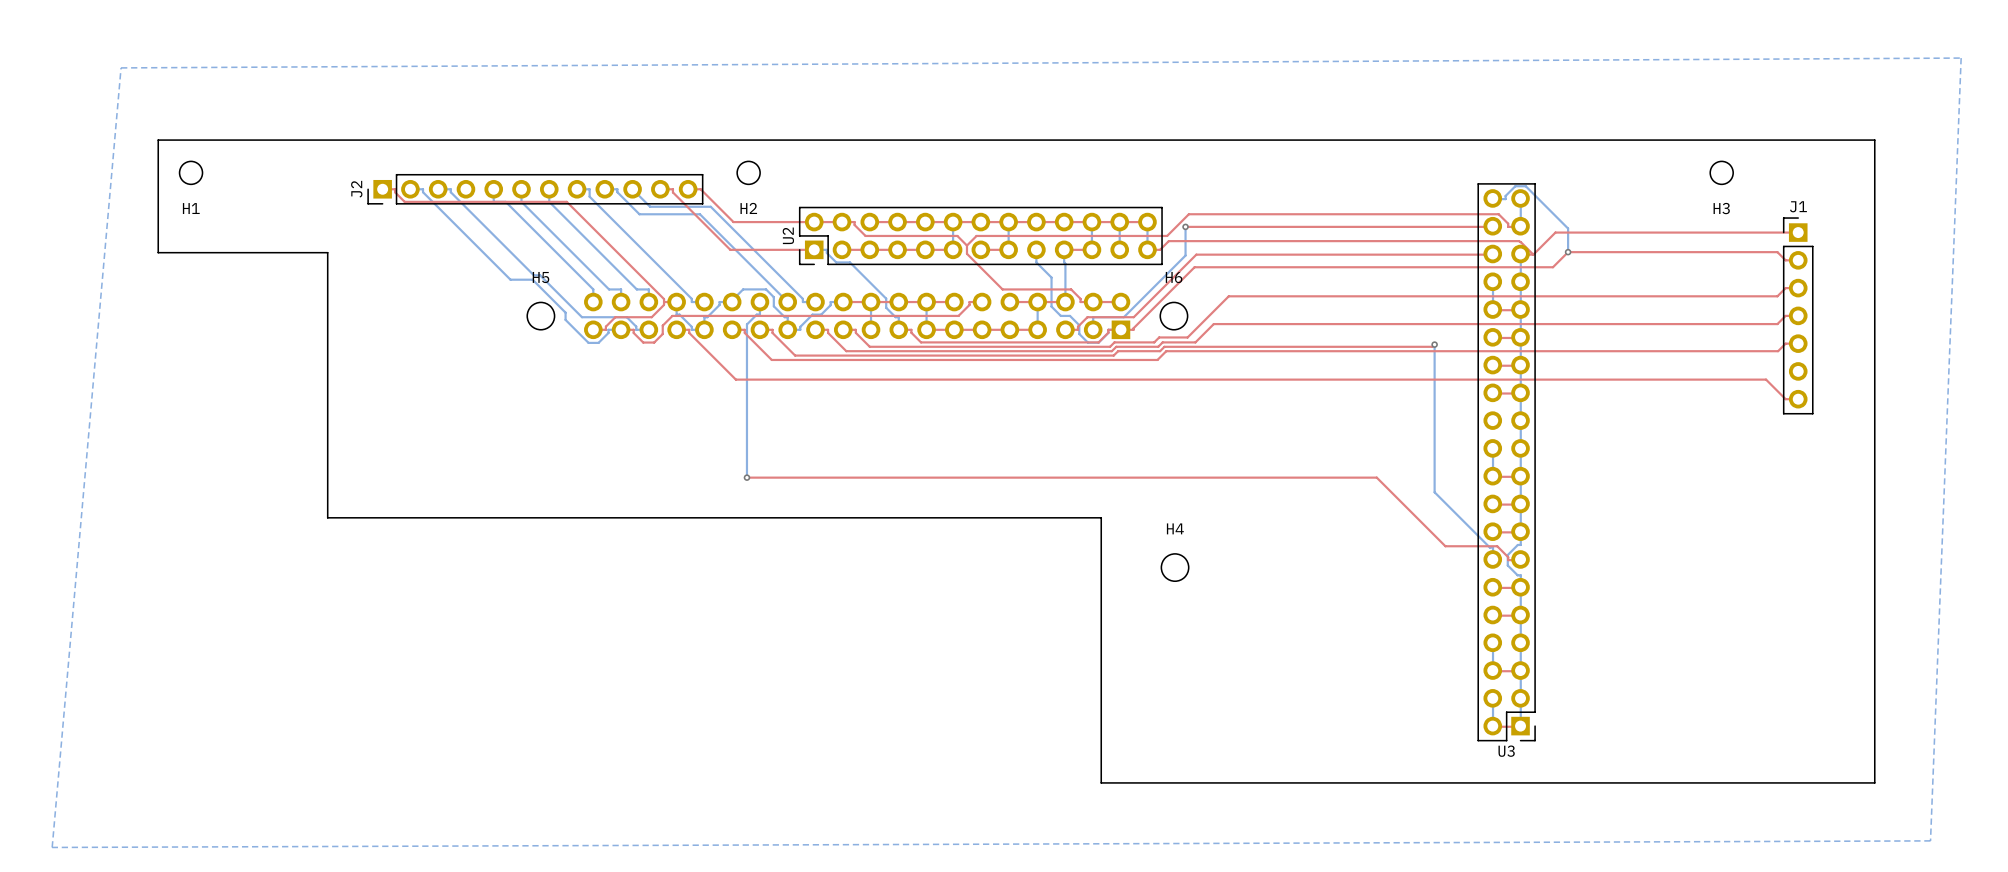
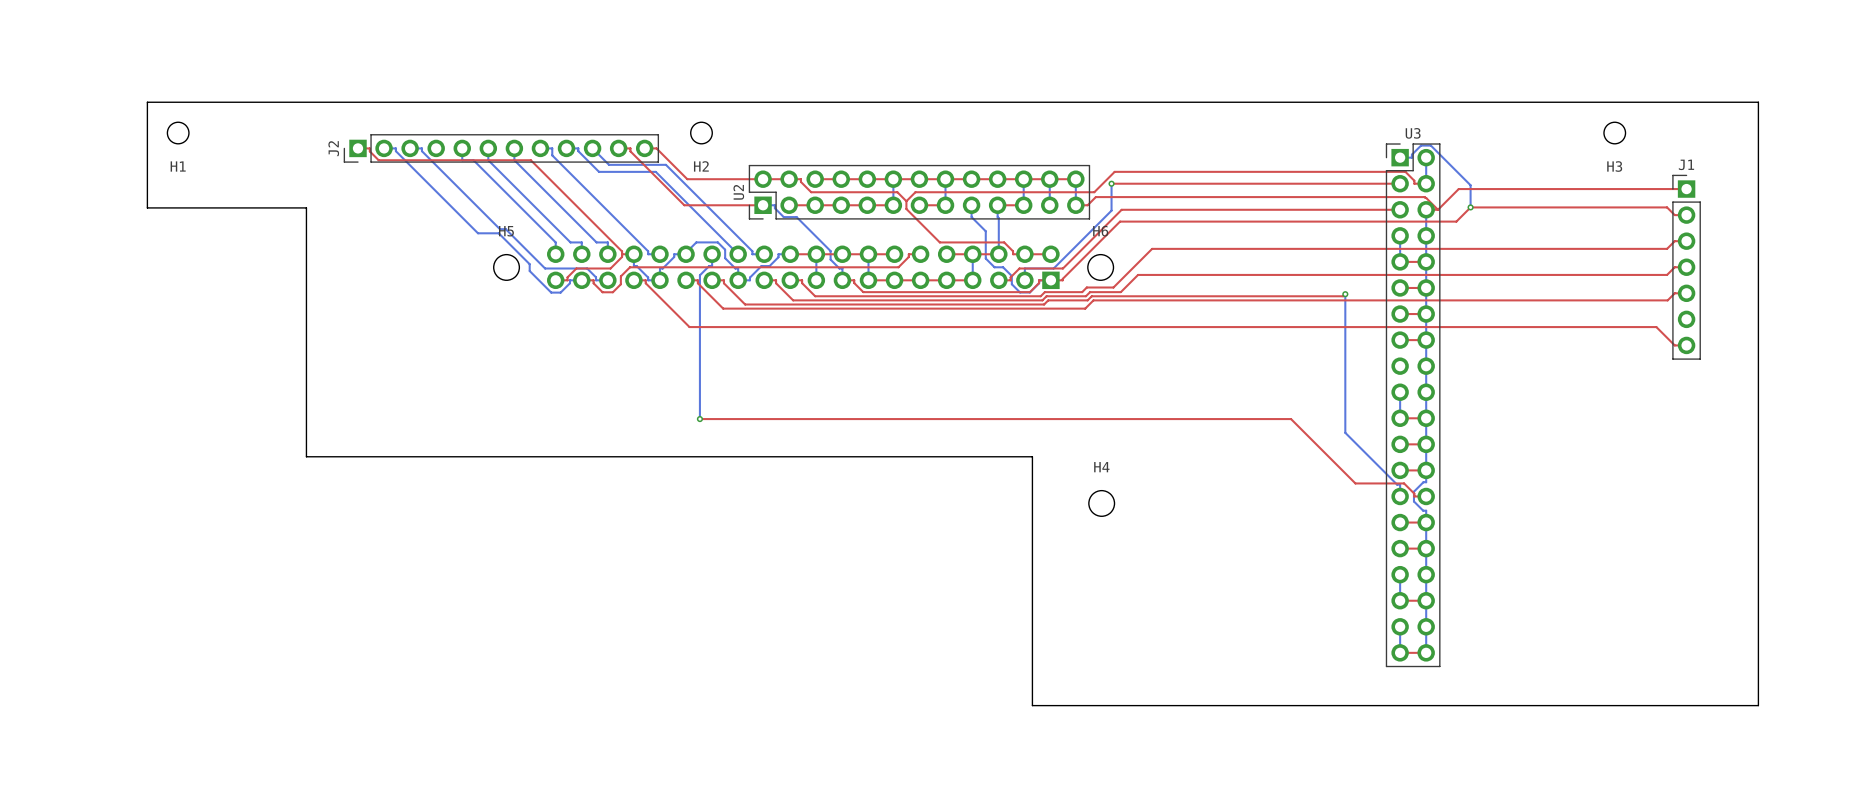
bottom zone outline: (1961, 58) (121, 67) (52, 847) (1930, 840) (1961, 58) -> none
U3 rotation: 0° (1506, 462) -> 180° (1413, 405)

